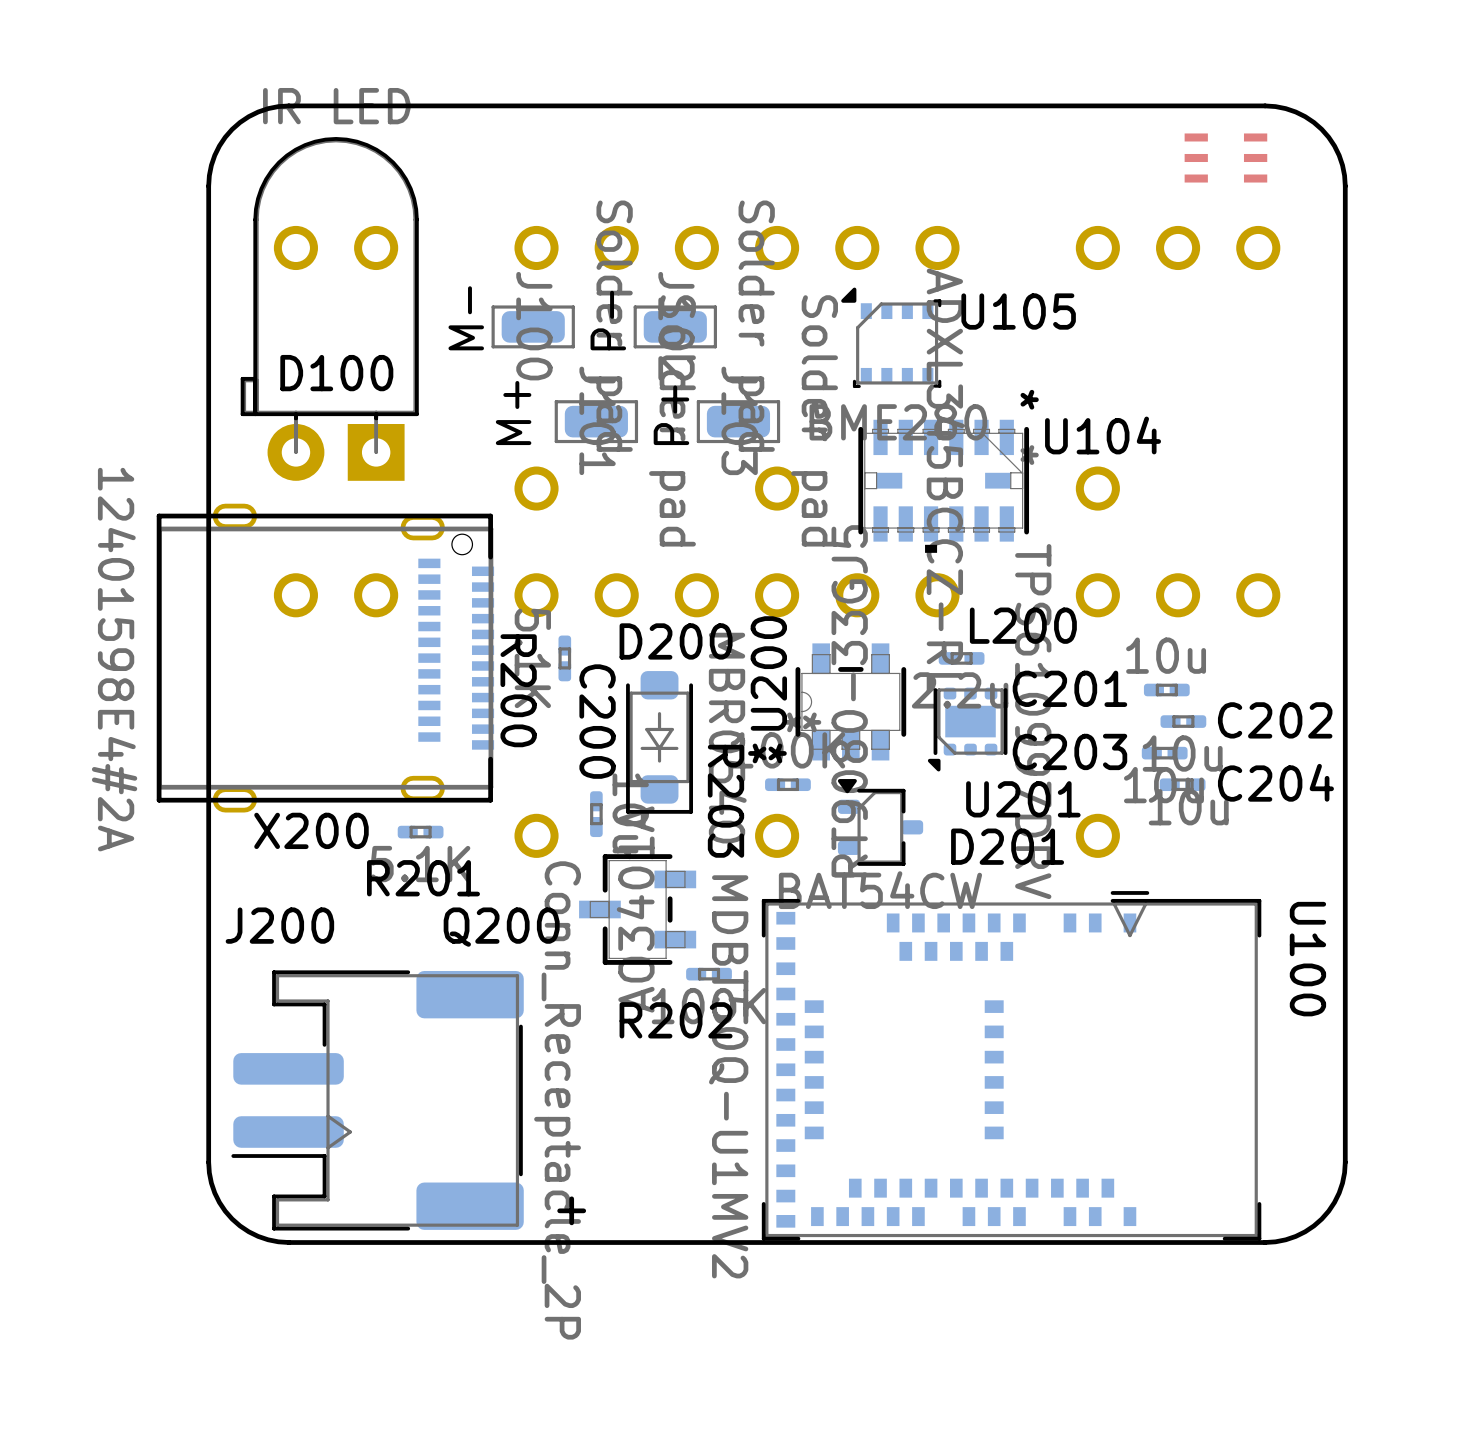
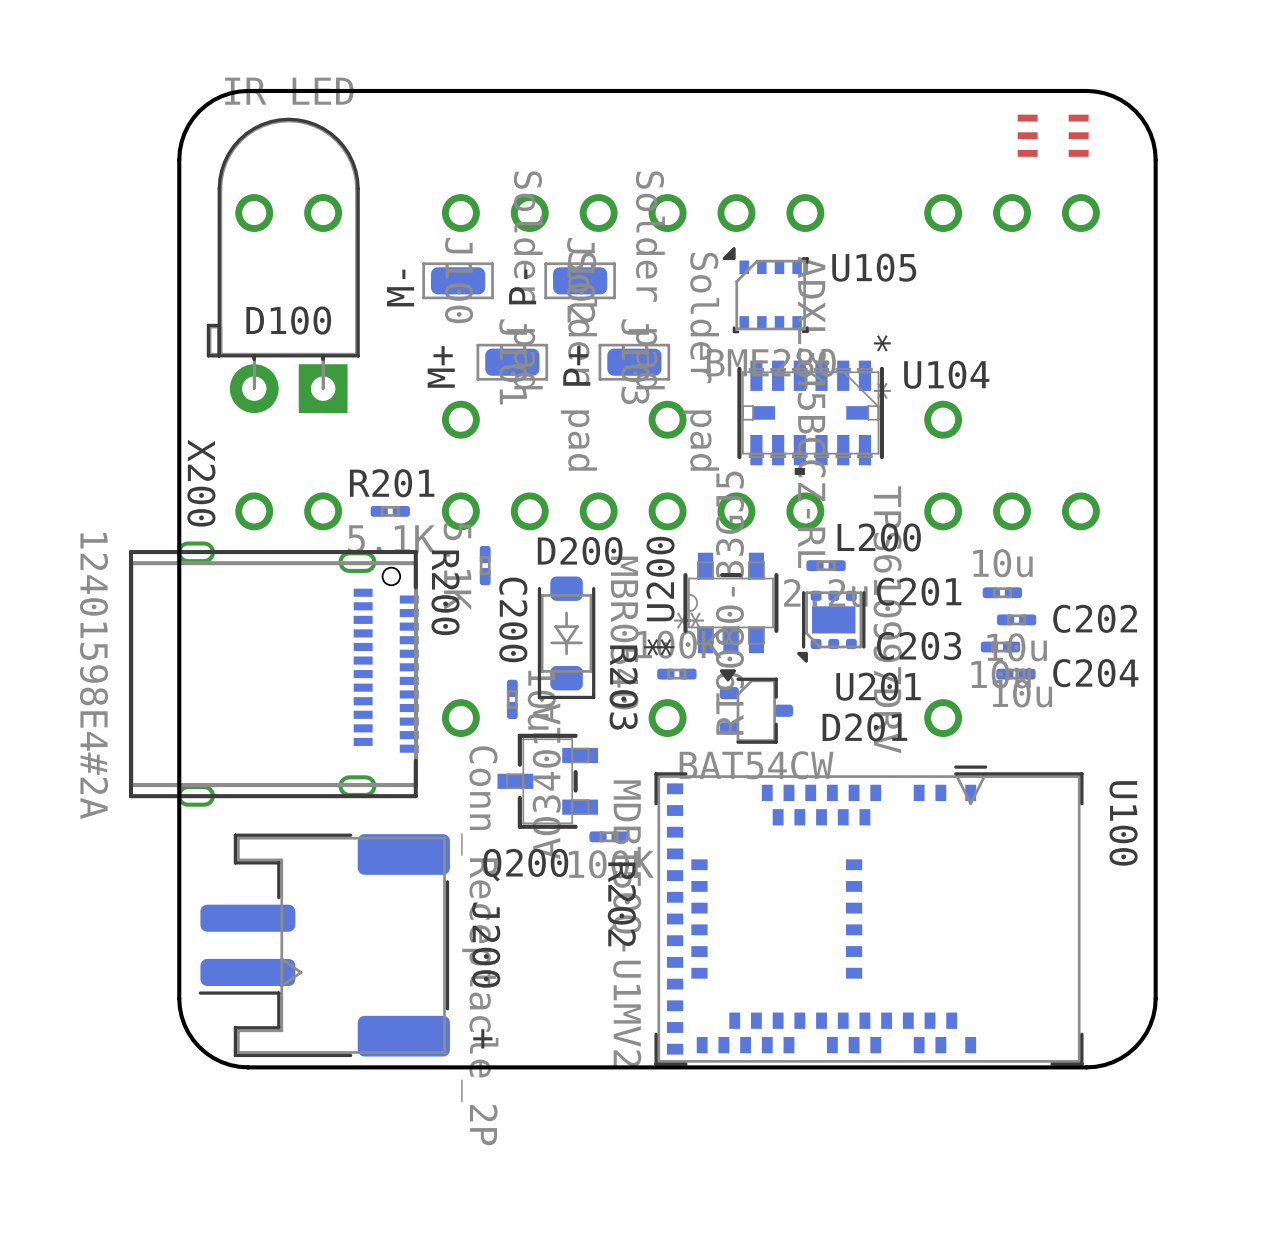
X200 position: (325, 658) -> (273, 674)
X200 name rotation: 0° (311, 830) -> 90° clockwise (201, 483)
X200 name position: X200 (311, 830) -> X200 (201, 483)
R201 position: (420, 832) -> (390, 511)
R201 name position: R201 (423, 878) -> R201 (392, 483)
J200 name rotation: 0° (279, 925) -> 90° clockwise (486, 945)
J200 name position: J200 (279, 925) -> J200 (486, 945)
Q200 name position: Q200 (501, 927) -> Q200 (525, 865)
R202 name rotation: 0° (676, 1020) -> 90° clockwise (621, 904)

